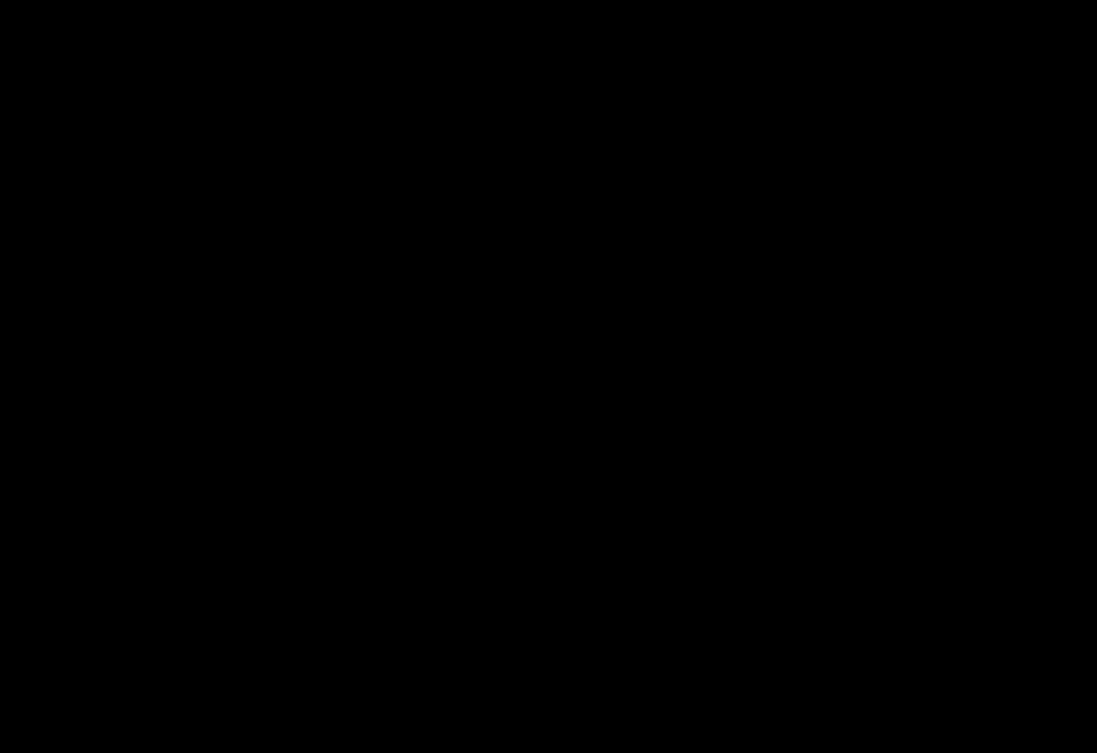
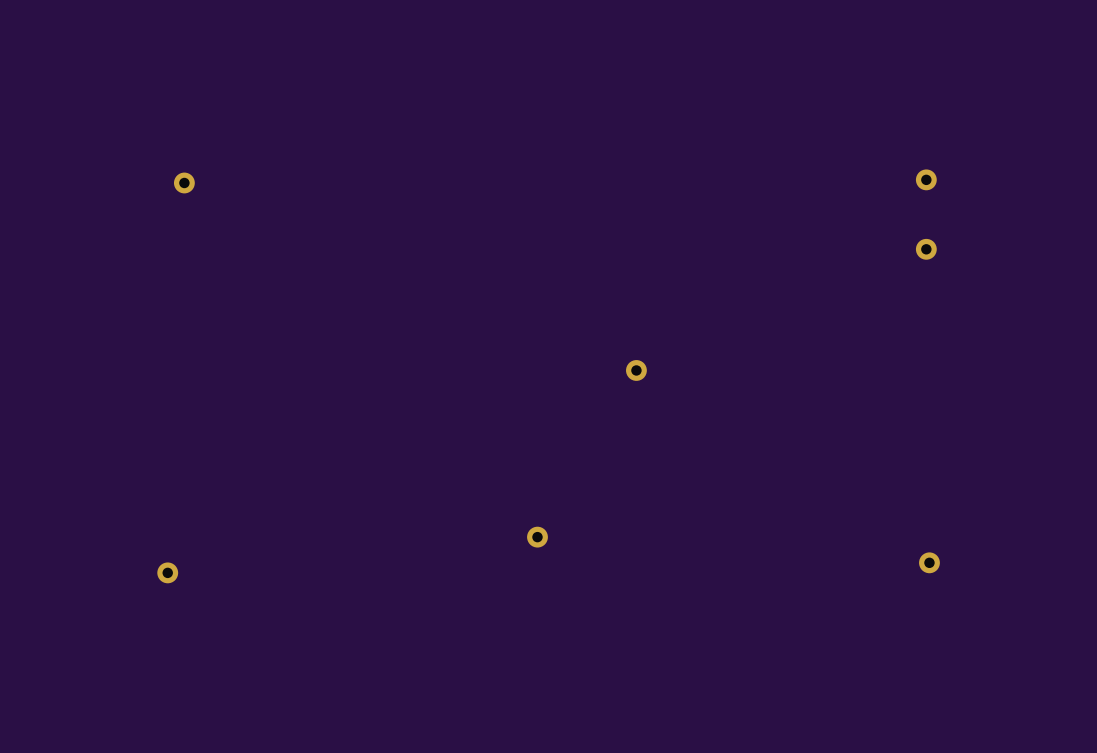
via: none -> (926, 179)
via: none -> (184, 182)
via: none -> (926, 249)
via: none -> (636, 370)
via: none -> (537, 537)
via: none -> (929, 562)
via: none -> (167, 572)

